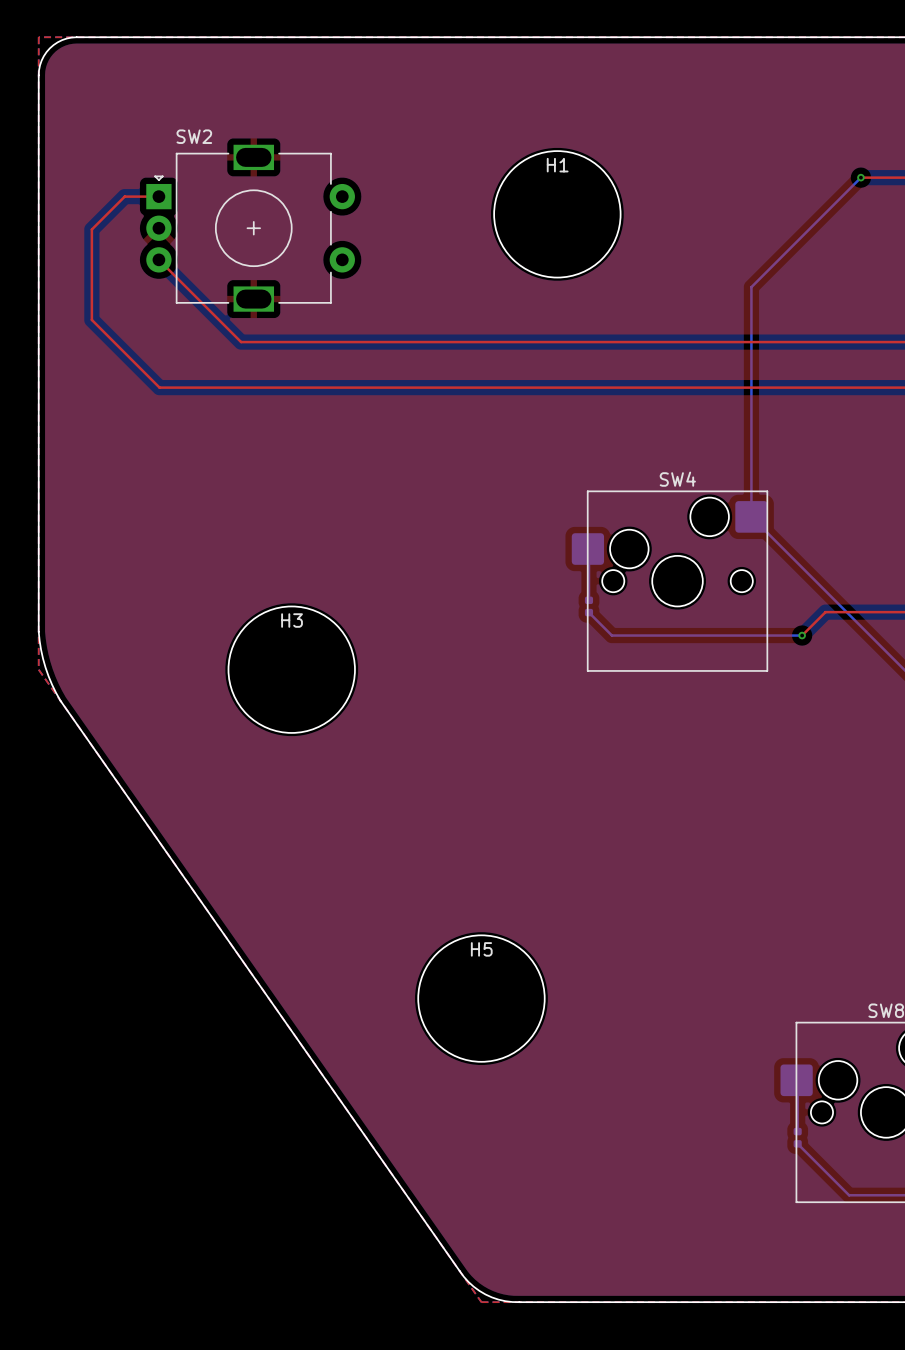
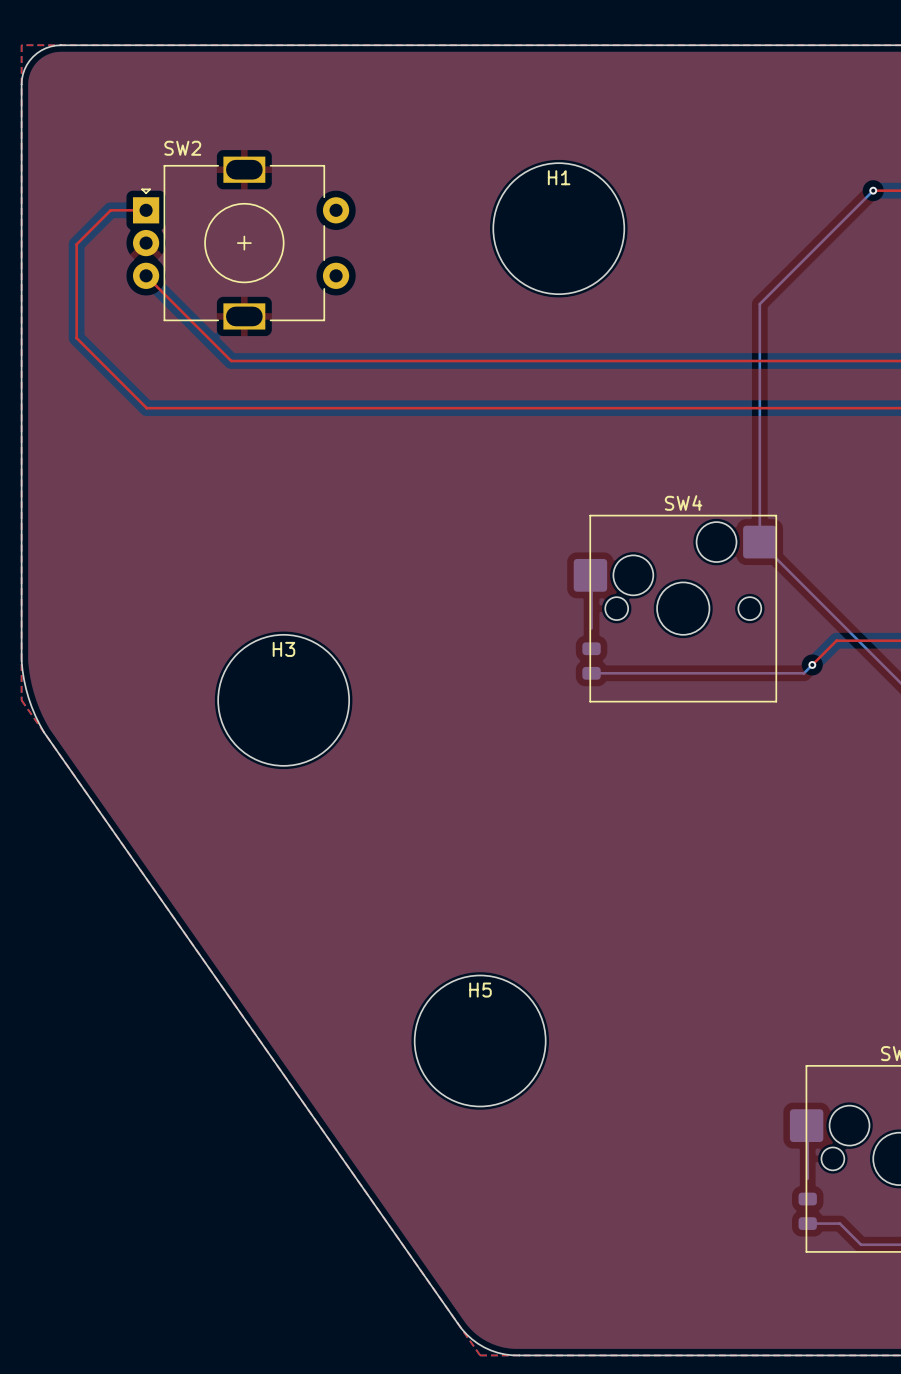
part: (588, 606) -> none
bottom track: (588, 612) (611, 635) (802, 635) -> (591, 673) (803, 673) (812, 664)
part: none -> (591, 661)
part: (797, 1137) -> none
bottom track: (797, 1143) (828, 1174) -> (807, 1223) (839, 1223)
part: none -> (807, 1211)

